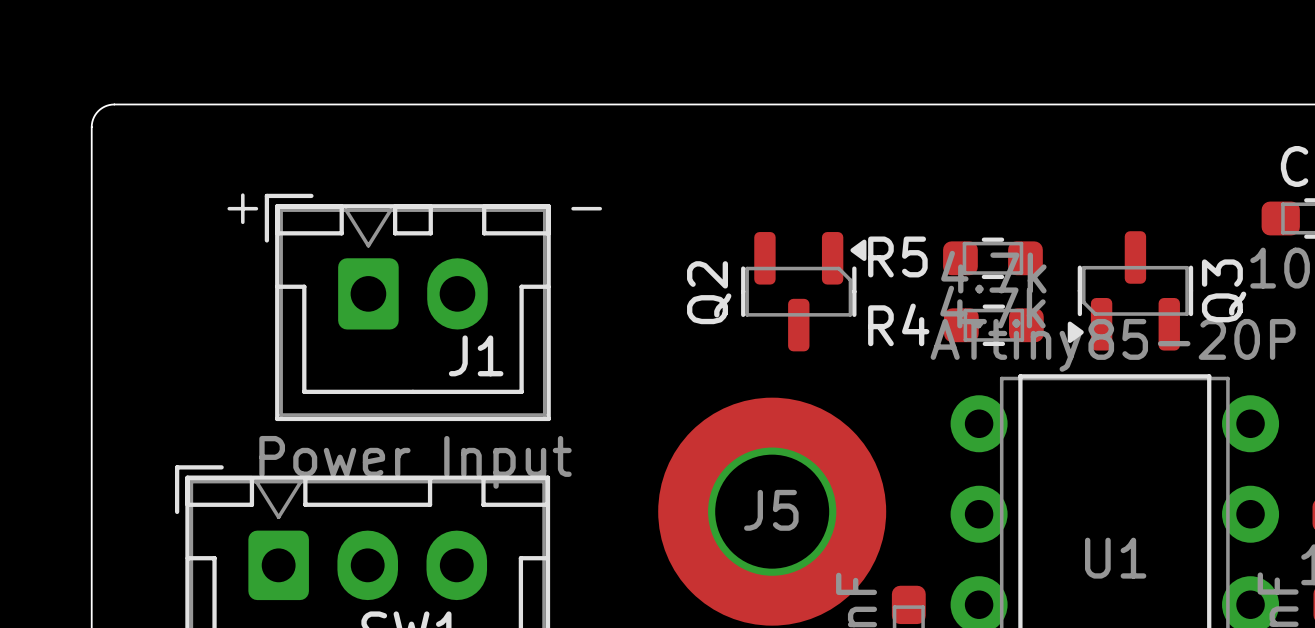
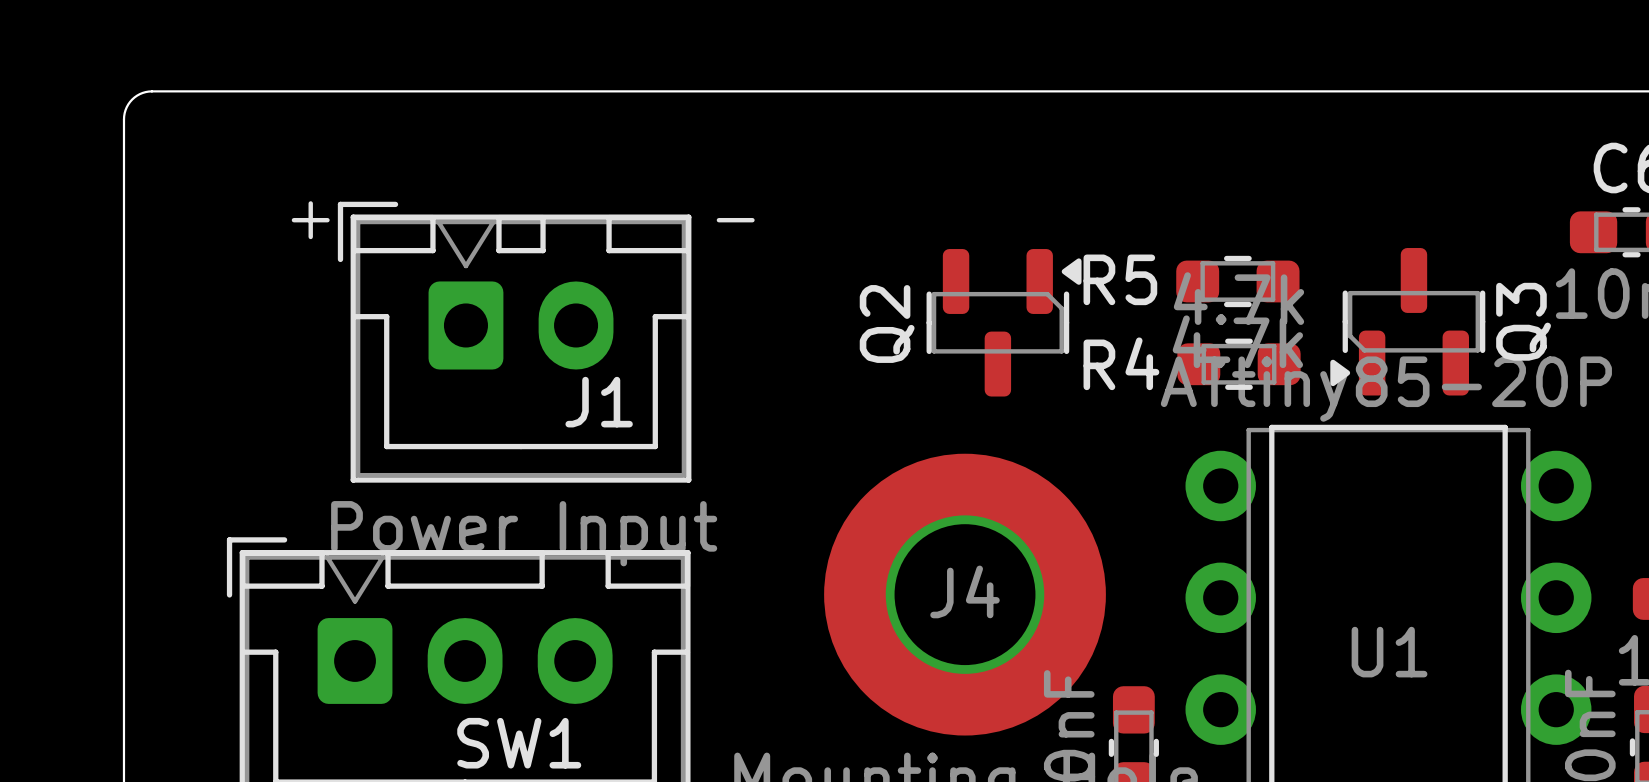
J5 name: J5 (771, 510) -> J4 (965, 591)

